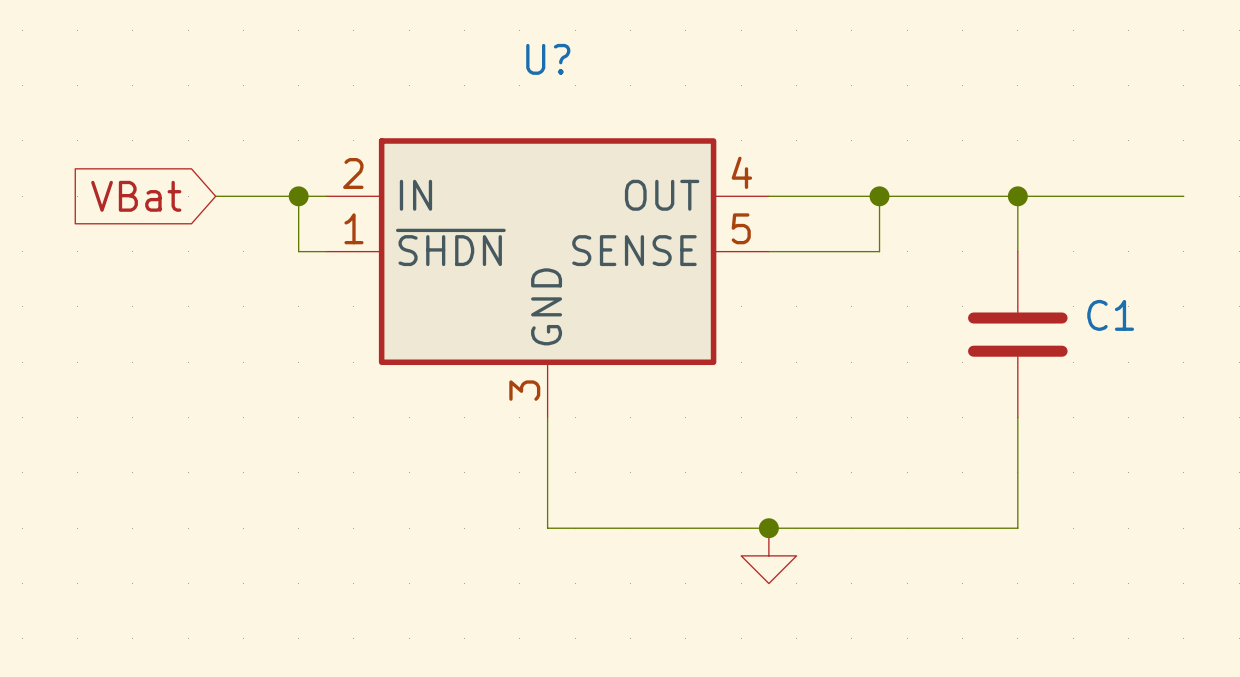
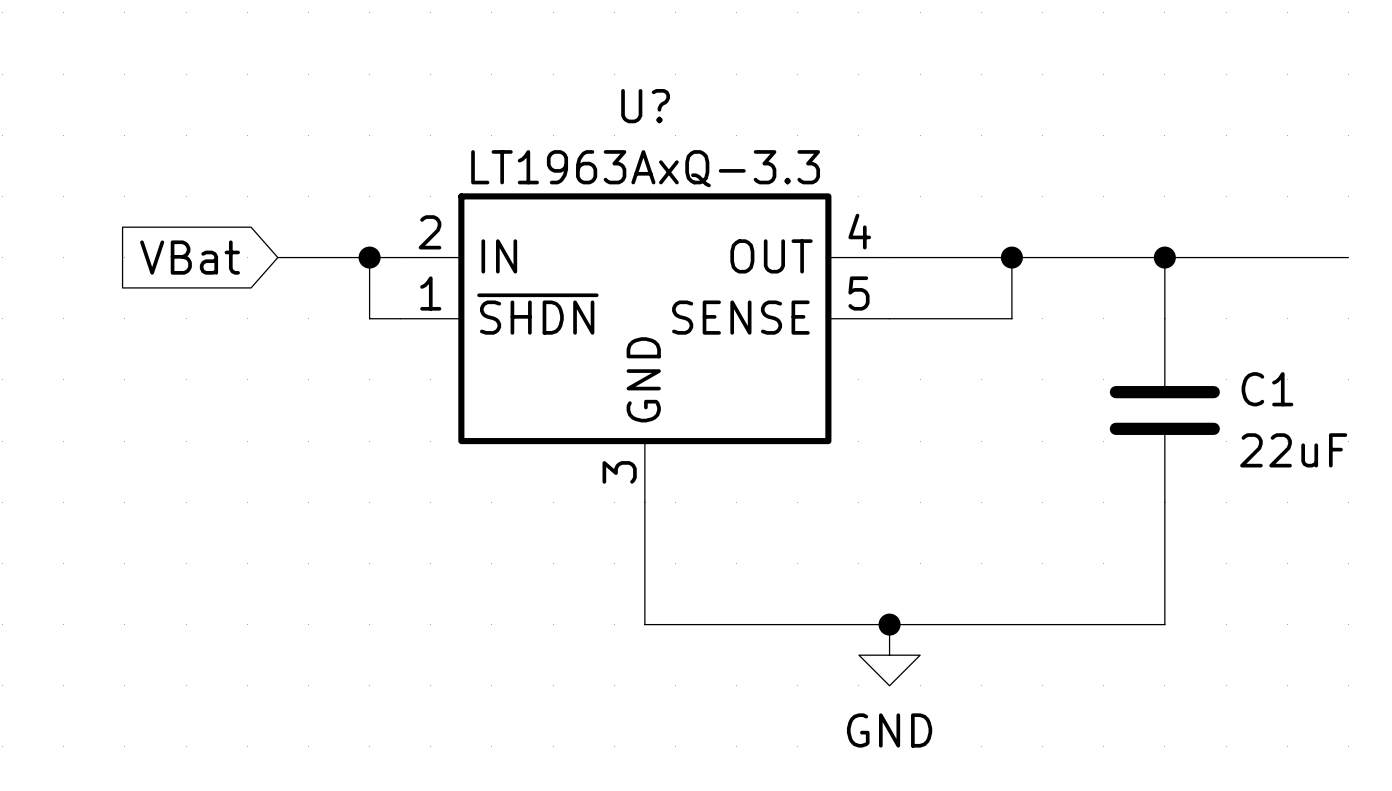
U? value: none -> LT1963AxQ-3.3 (645, 168)
C1 value: none -> 22uF (1293, 450)
power symbol text: none -> GND (889, 730)

